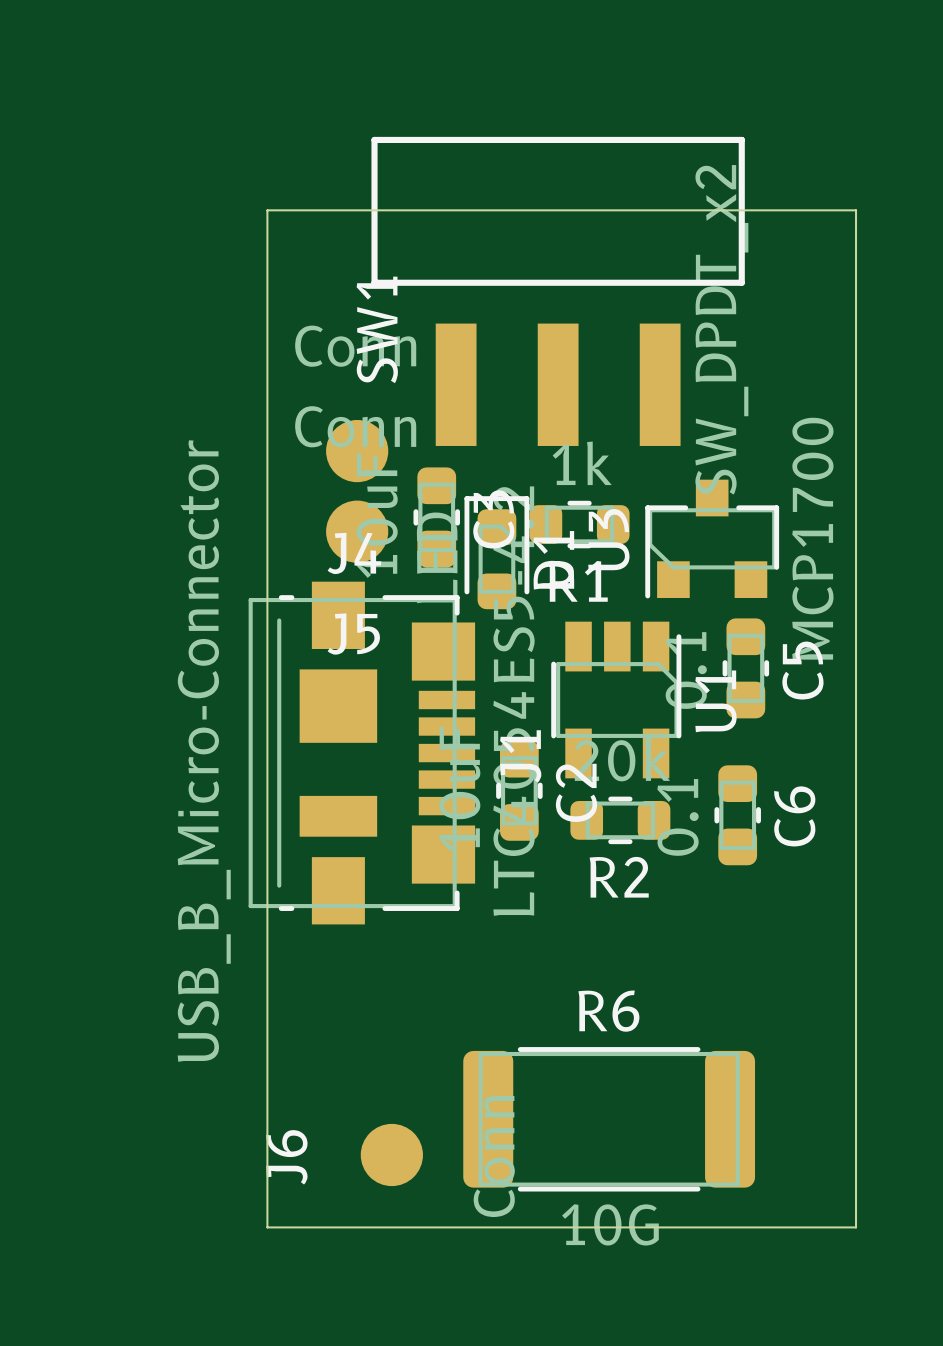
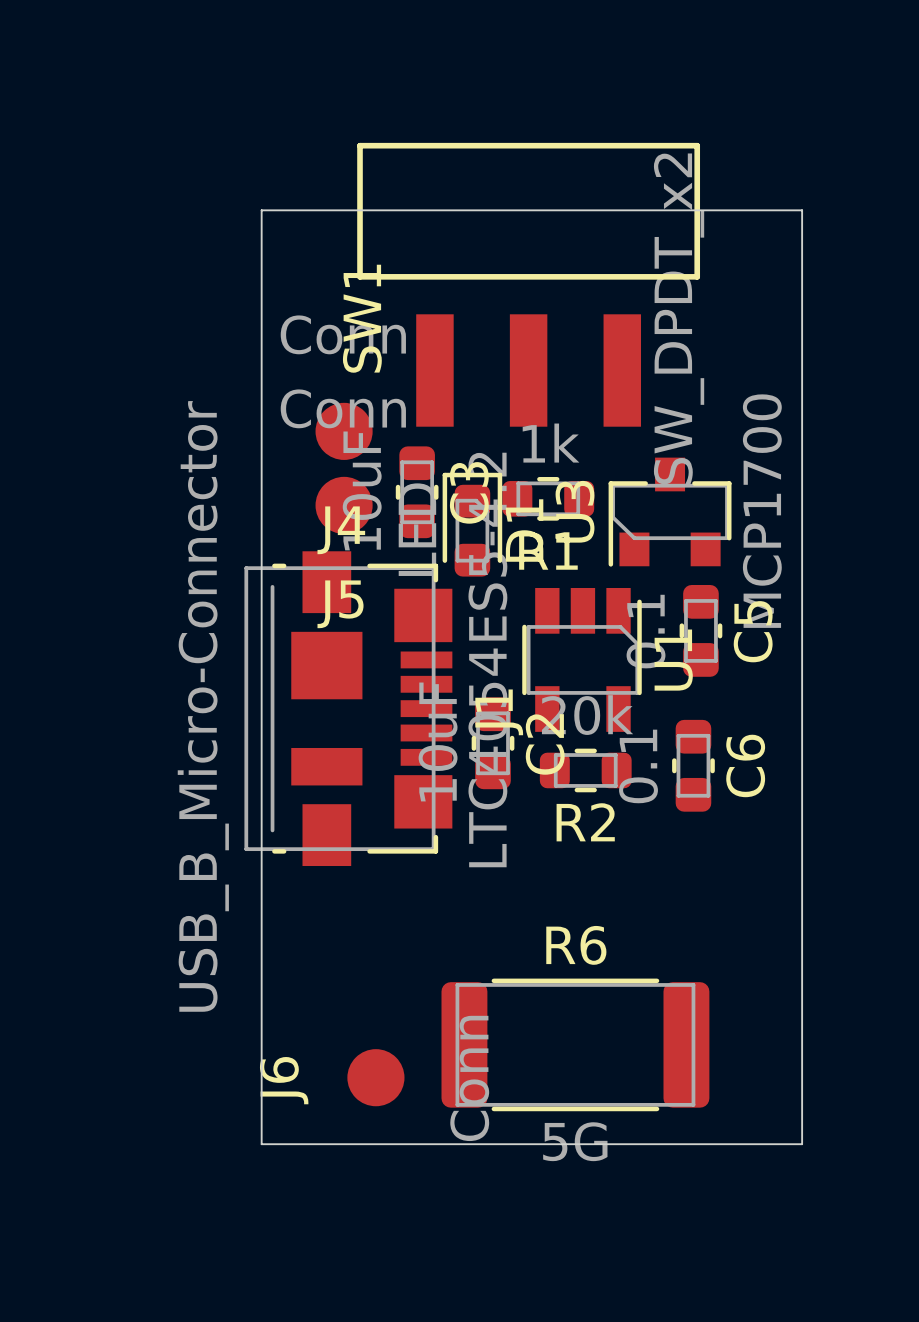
R6 value: 10G (610, 1224) -> 5G (575, 1141)

